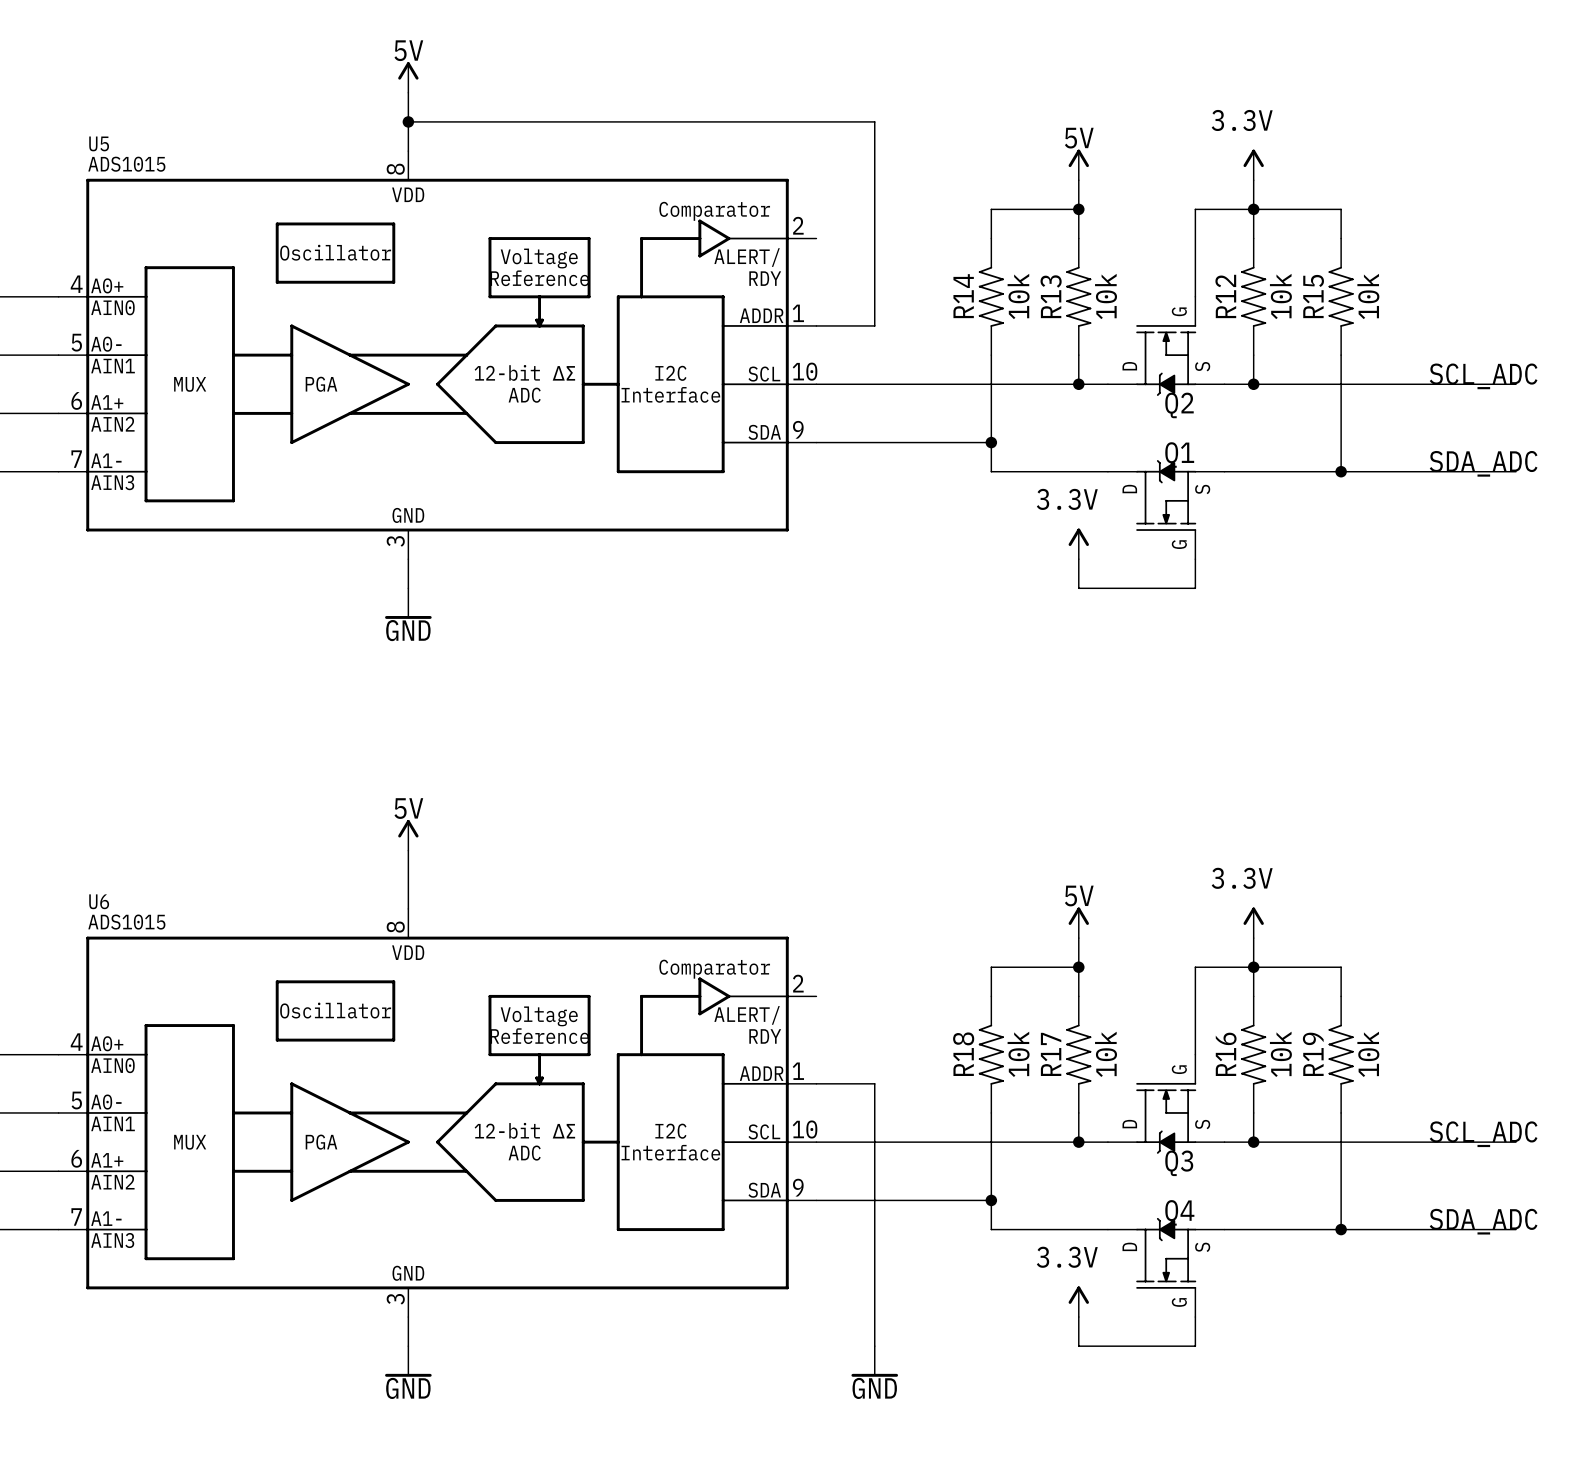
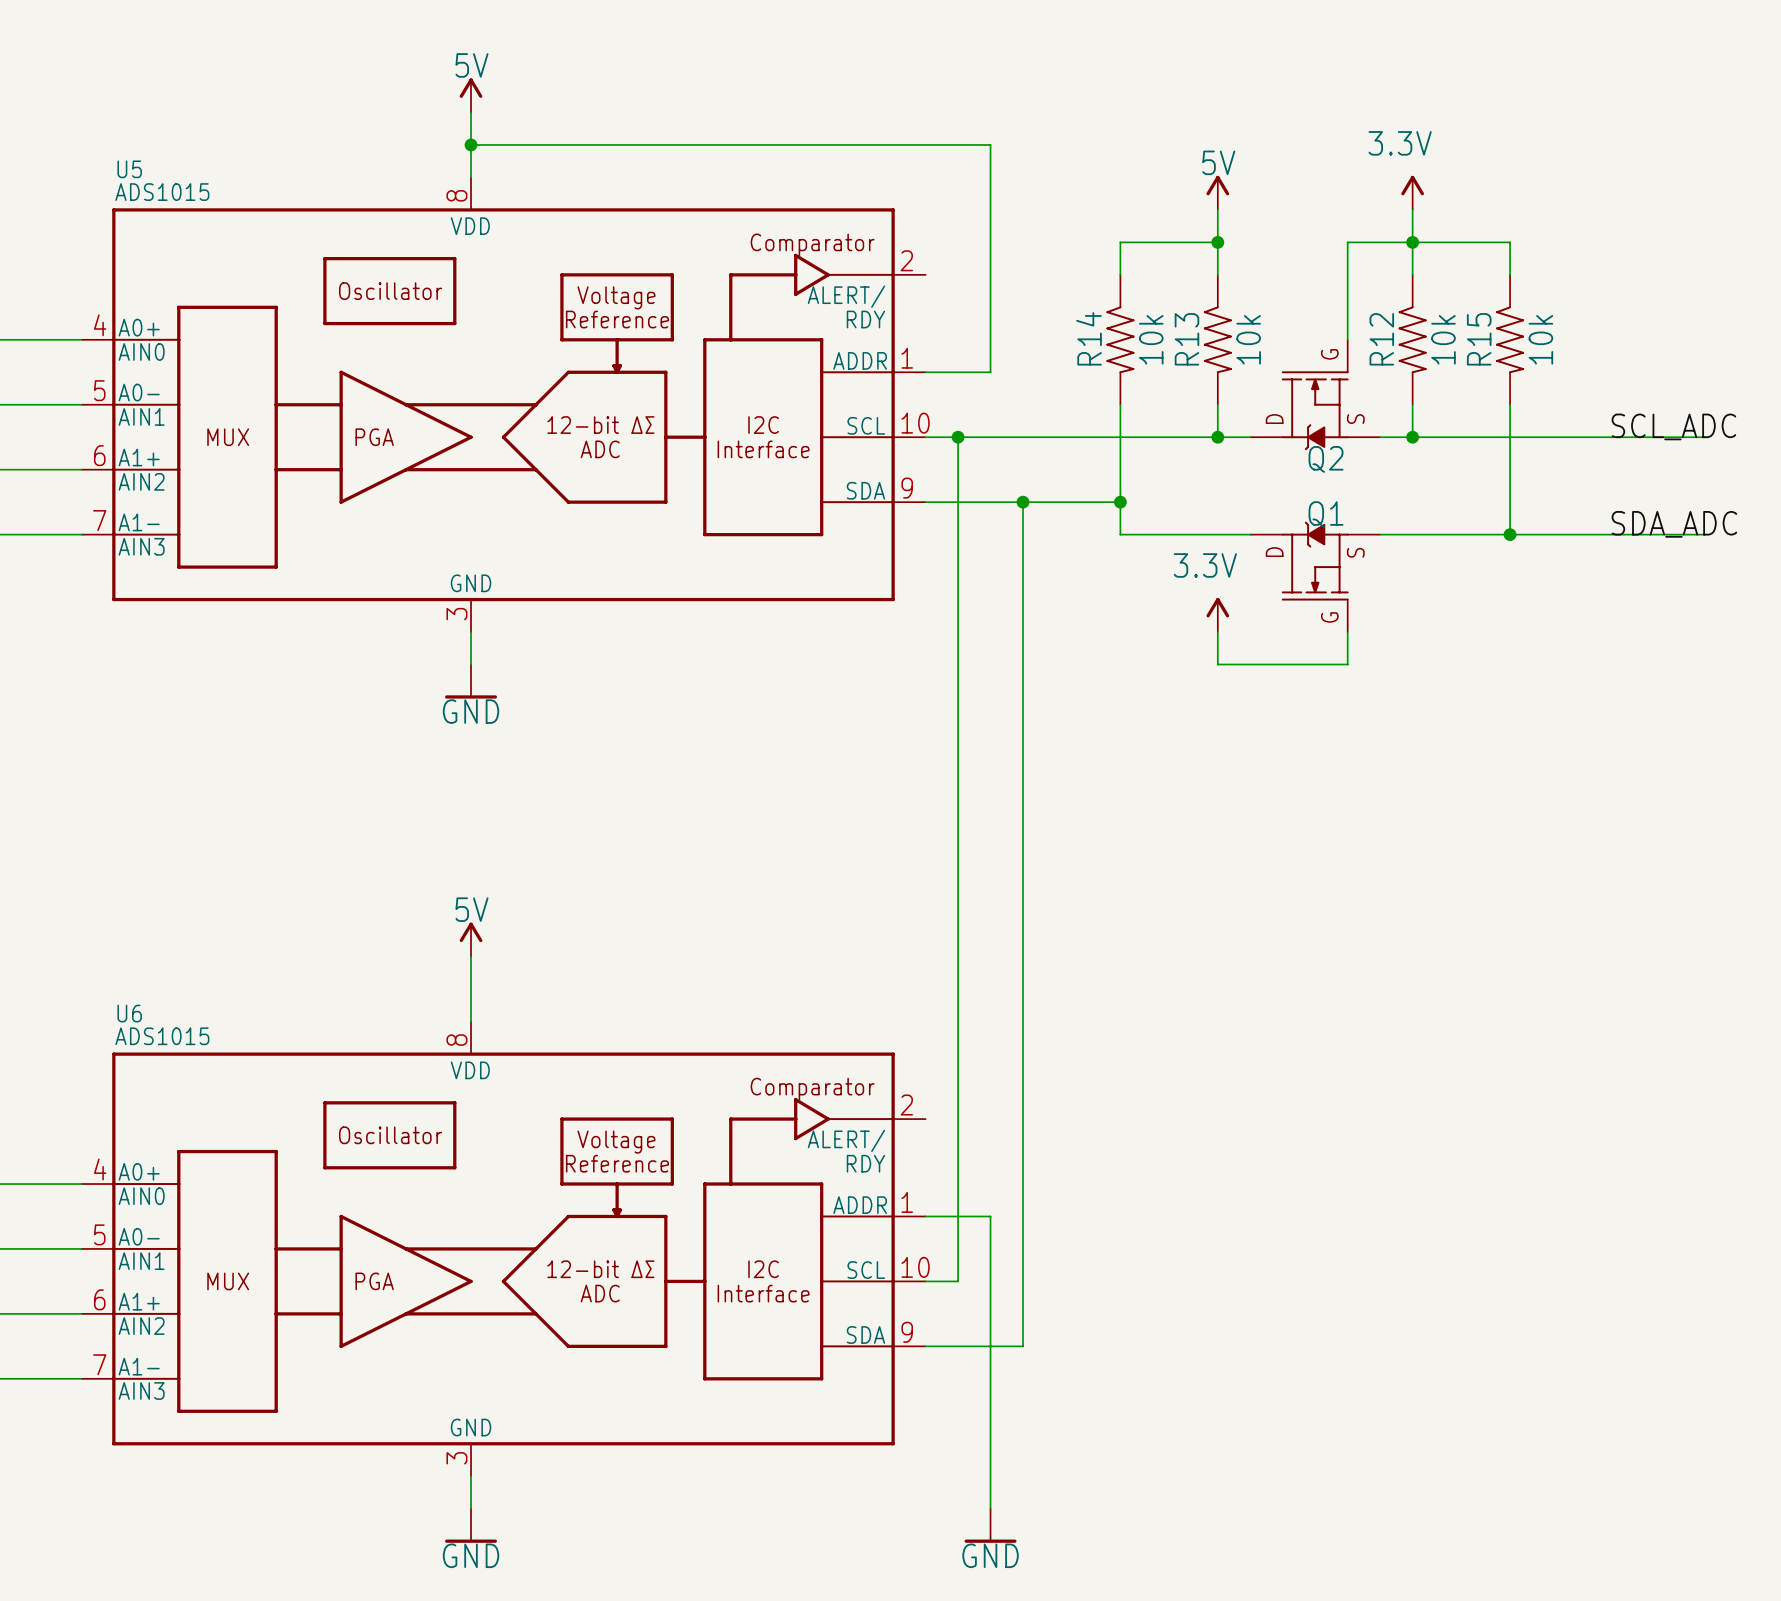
junction: none -> (958, 437)
junction: none -> (1023, 502)
power symbol: 5V (1078, 922) -> none
power symbol: 3.3V (1253, 922) -> none
wire: (1078, 938) (1078, 996) -> none
wire: (1253, 938) (1253, 996) -> none
wire: (1078, 967) (991, 967) (991, 996) -> none
junction: (1078, 967) -> none
junction: (1253, 967) -> none
wire: (1341, 996) (1341, 967) (1195, 967) (1195, 1054) -> none
R18: 10k (991, 1054) -> none
R17: 10k (1078, 1054) -> none
R16: 10k (1253, 1054) -> none
R19: 10k (1341, 1054) -> none
Q3: (1166, 1104) -> none
wire: (991, 1112) (991, 1229) (1107, 1229) -> none
wire: (1078, 1112) (1078, 1142) -> none
wire: (1253, 1112) (1253, 1142) -> none
wire: (1341, 1112) (1341, 1229) -> none
label: SCL_ADC (1483, 1134) -> none
wire: (845, 1142) (1107, 1142) -> (958, 1281) (958, 437)
junction: (1078, 1142) -> none
wire: (1224, 1142) (1516, 1142) -> none
junction: (1253, 1142) -> none
wire: (903, 1200) (991, 1200) -> (1023, 1346) (1023, 502)
junction: (991, 1200) -> none
label: SDA_ADC (1483, 1221) -> none
wire: (1224, 1229) (1516, 1229) -> none
junction: (1341, 1229) -> none
Q4: (1166, 1267) -> none
power symbol: 3.3V (1078, 1301) -> none
wire: (1078, 1317) (1078, 1346) (1195, 1346) (1195, 1317) -> none

